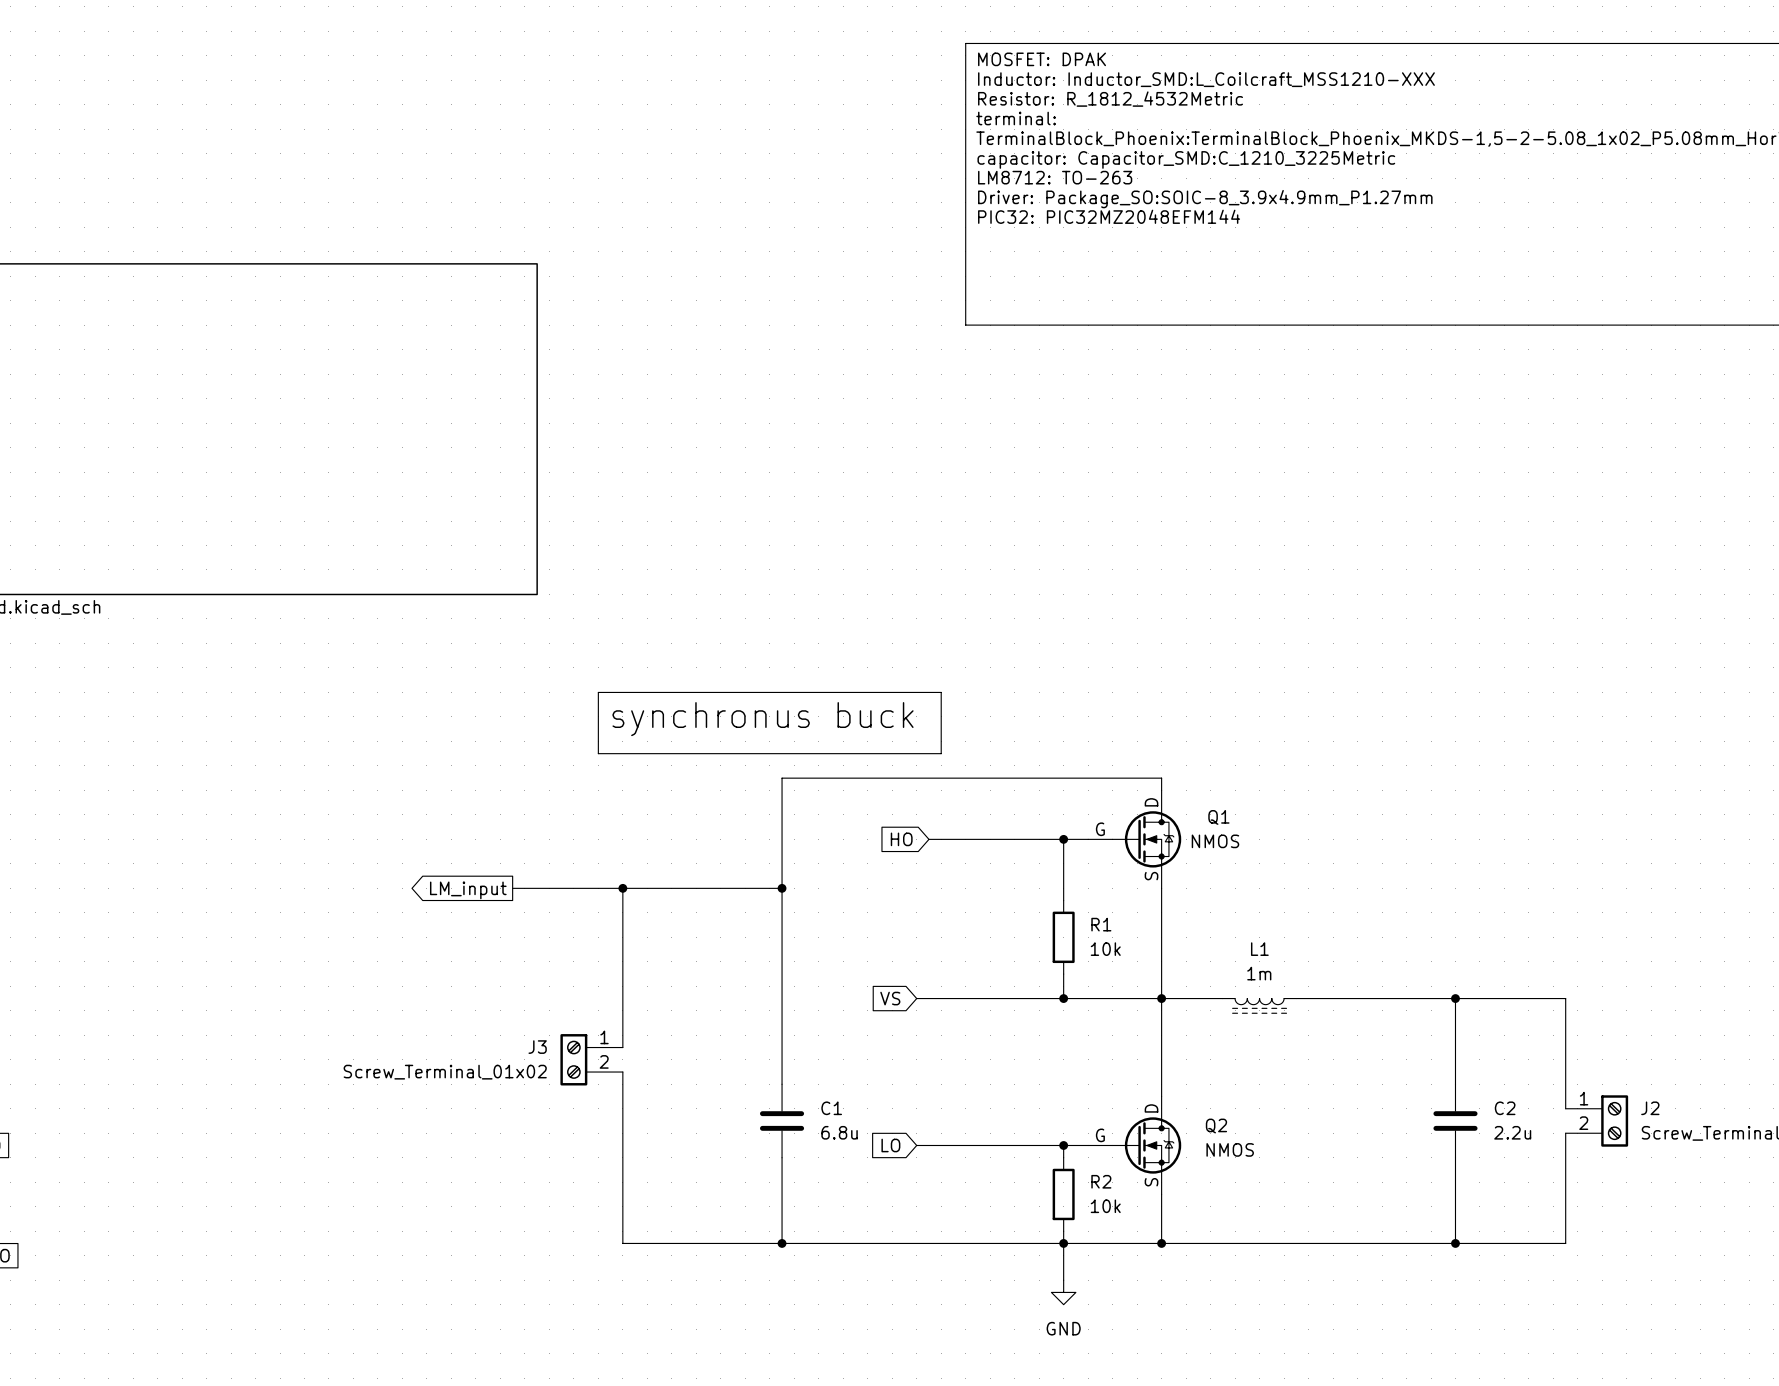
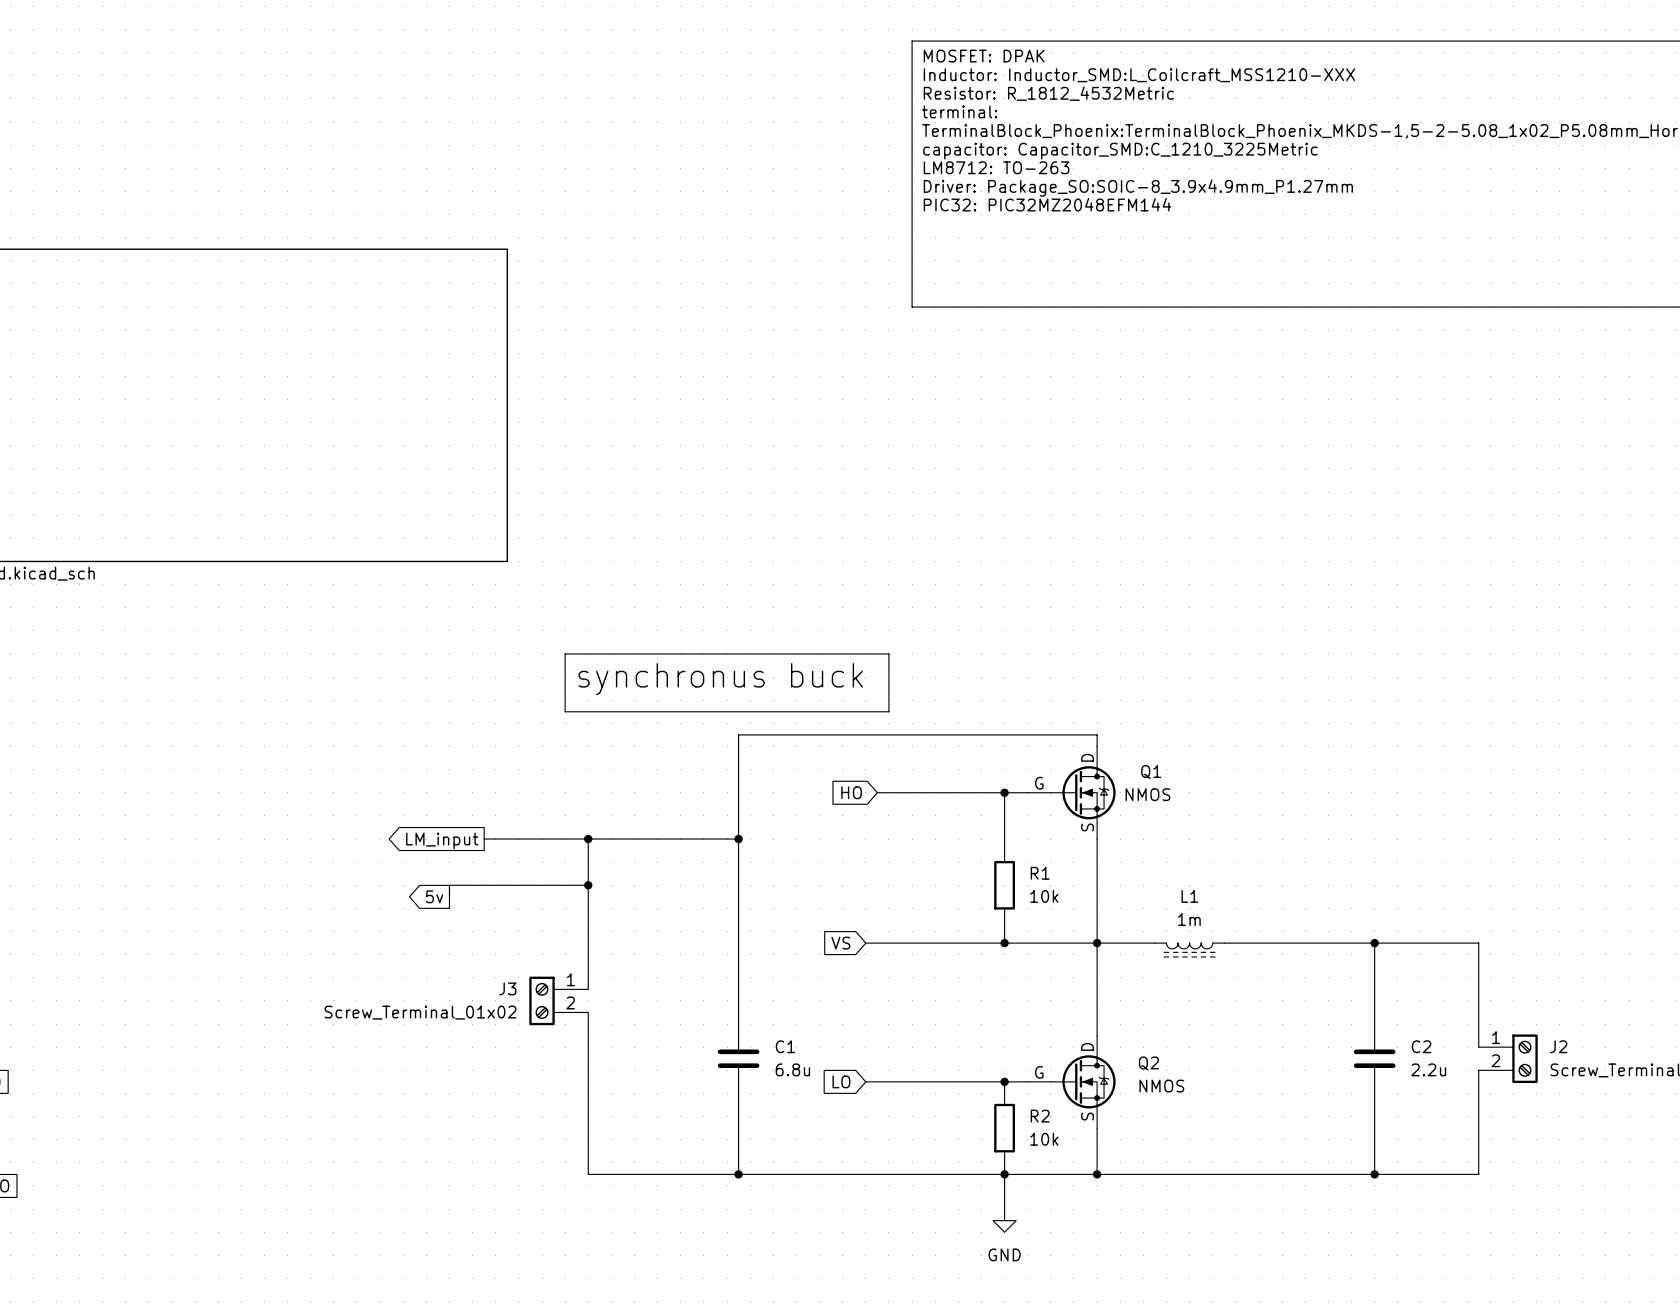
wire: none -> (588, 885) (449, 885) (449, 896)
junction: none -> (588, 885)
global label: none -> 5v (434, 896)

